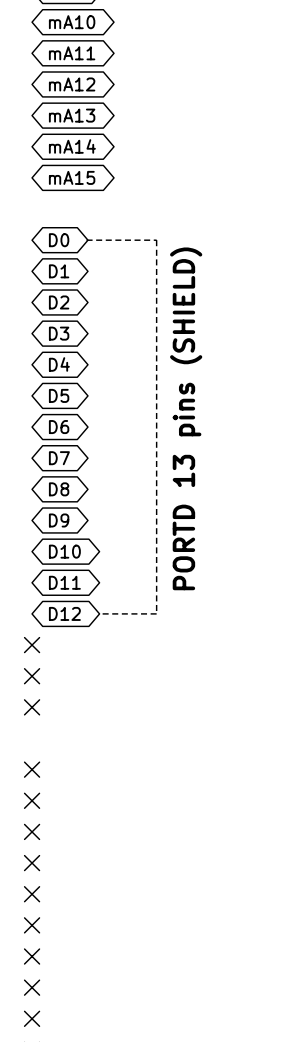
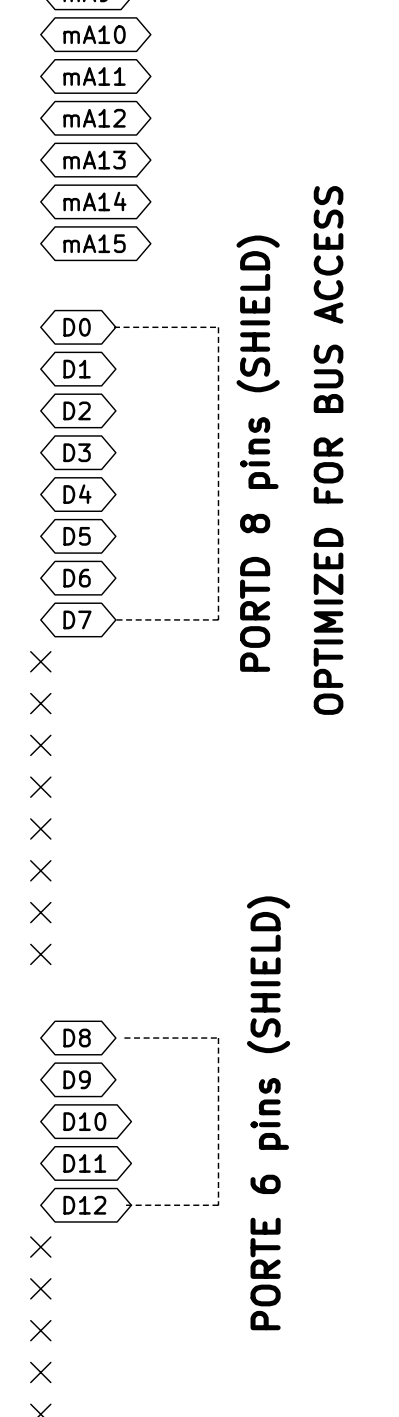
line: (156, 240) (156, 613) (102, 613) -> (208, 327) (218, 327) (218, 619) (113, 619)
text: none -> OPTIMIZED FOR BUS ACCESS (328, 450)
text: PORTD 13 pins (SHIELD) (186, 418) -> PORTD 8 pins (SHIELD) (258, 453)
no-connect mark: none -> (40, 661)
global label position: D8 (59, 489) -> D8 (77, 1038)
no-connect mark: none -> (40, 703)
global label position: D9 (59, 520) -> D9 (77, 1079)
no-connect mark: none -> (40, 745)
global label position: D10 (64, 551) -> D10 (84, 1121)
no-connect mark: none -> (40, 787)
global label position: D11 (64, 582) -> D11 (84, 1163)
no-connect mark: none -> (40, 828)
global label position: D12 (64, 613) -> D12 (84, 1205)
no-connect mark: (32, 769) -> none
line: none -> (124, 1038) (218, 1038) (218, 1205) (124, 1205)
no-connect mark: (32, 800) -> none
text: none -> PORTE 6 pins (SHIELD) (268, 1113)
no-connect mark: (32, 831) -> none
no-connect mark: (32, 863) -> none
no-connect mark: (32, 894) -> none

